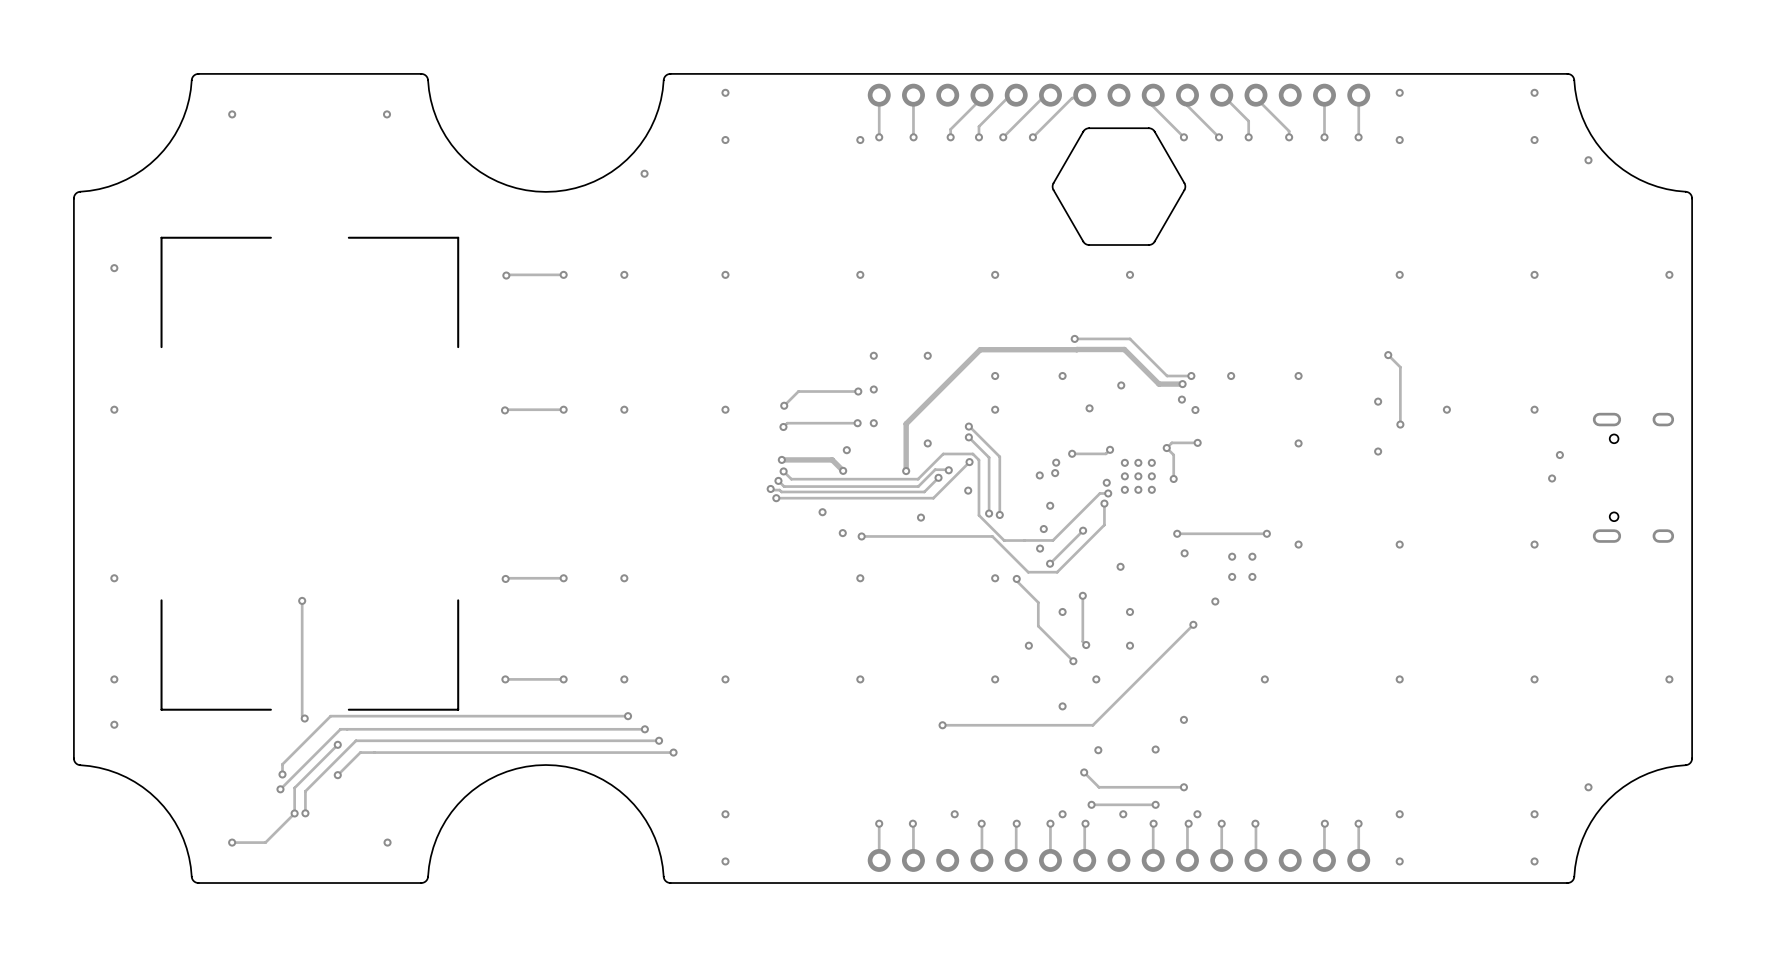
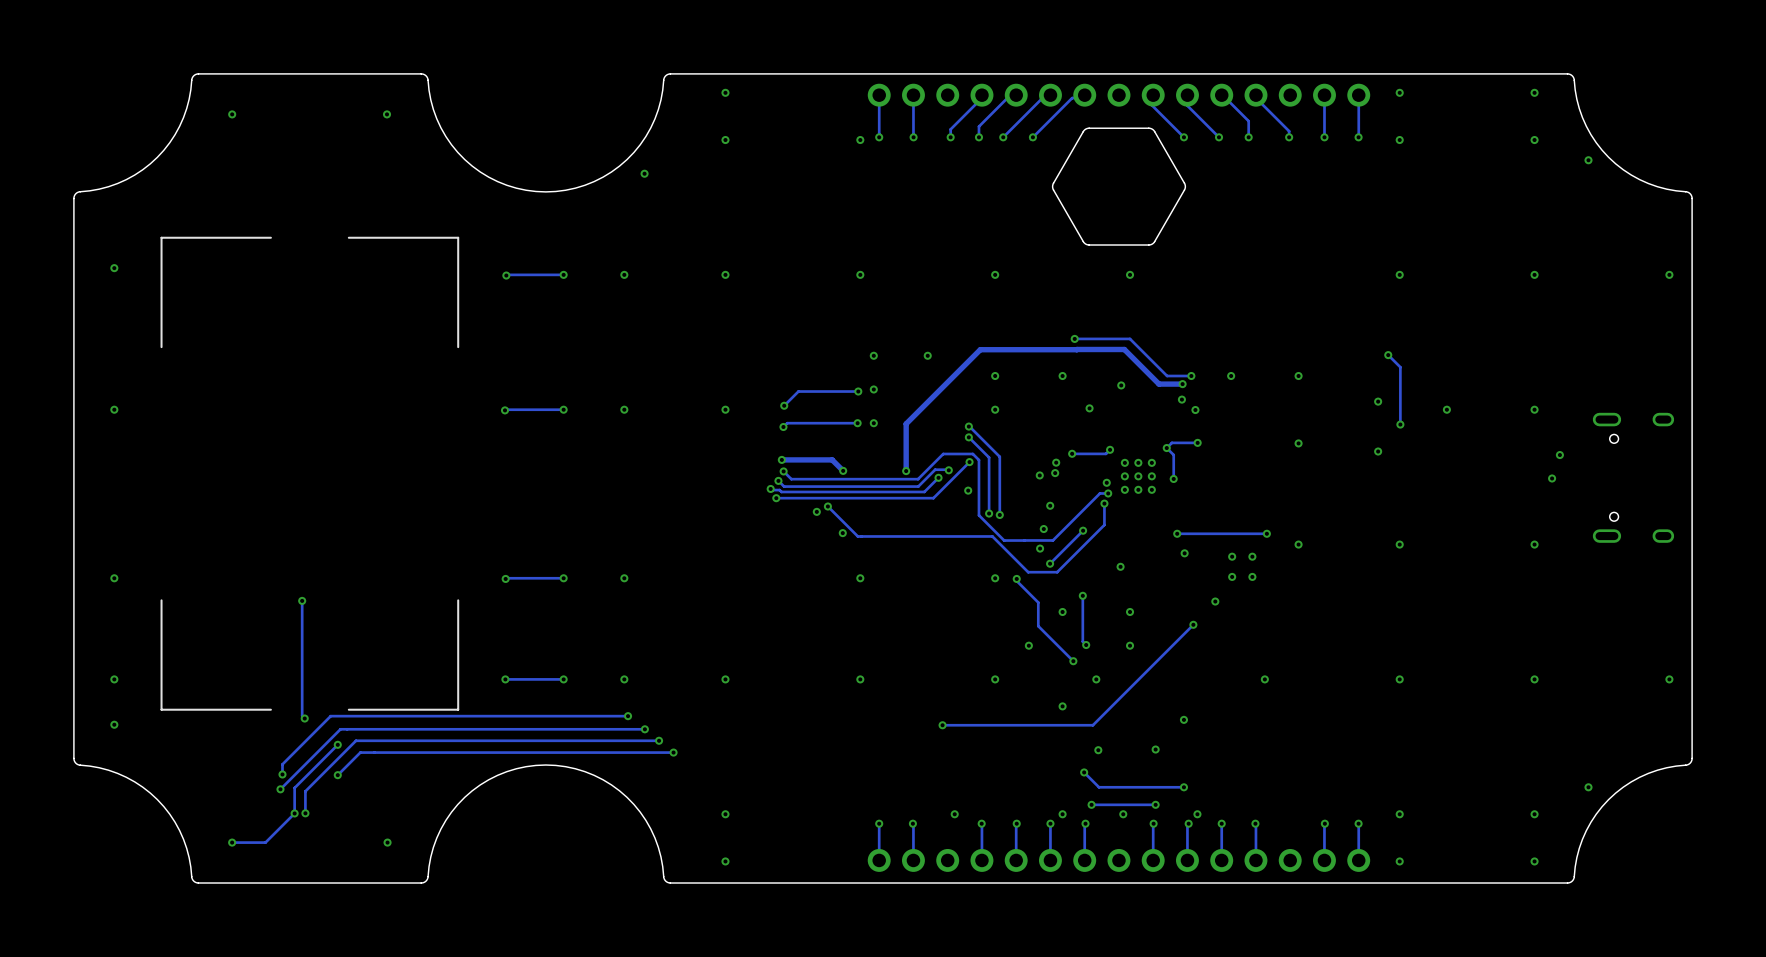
via: (927, 443) -> none
via: (846, 450) -> none
track: none -> (827, 506) (857, 536) (861, 536)
via: none -> (827, 506)
via: none -> (816, 511)
via: (822, 512) -> none
via: (921, 517) -> none
via: (861, 536) -> none

